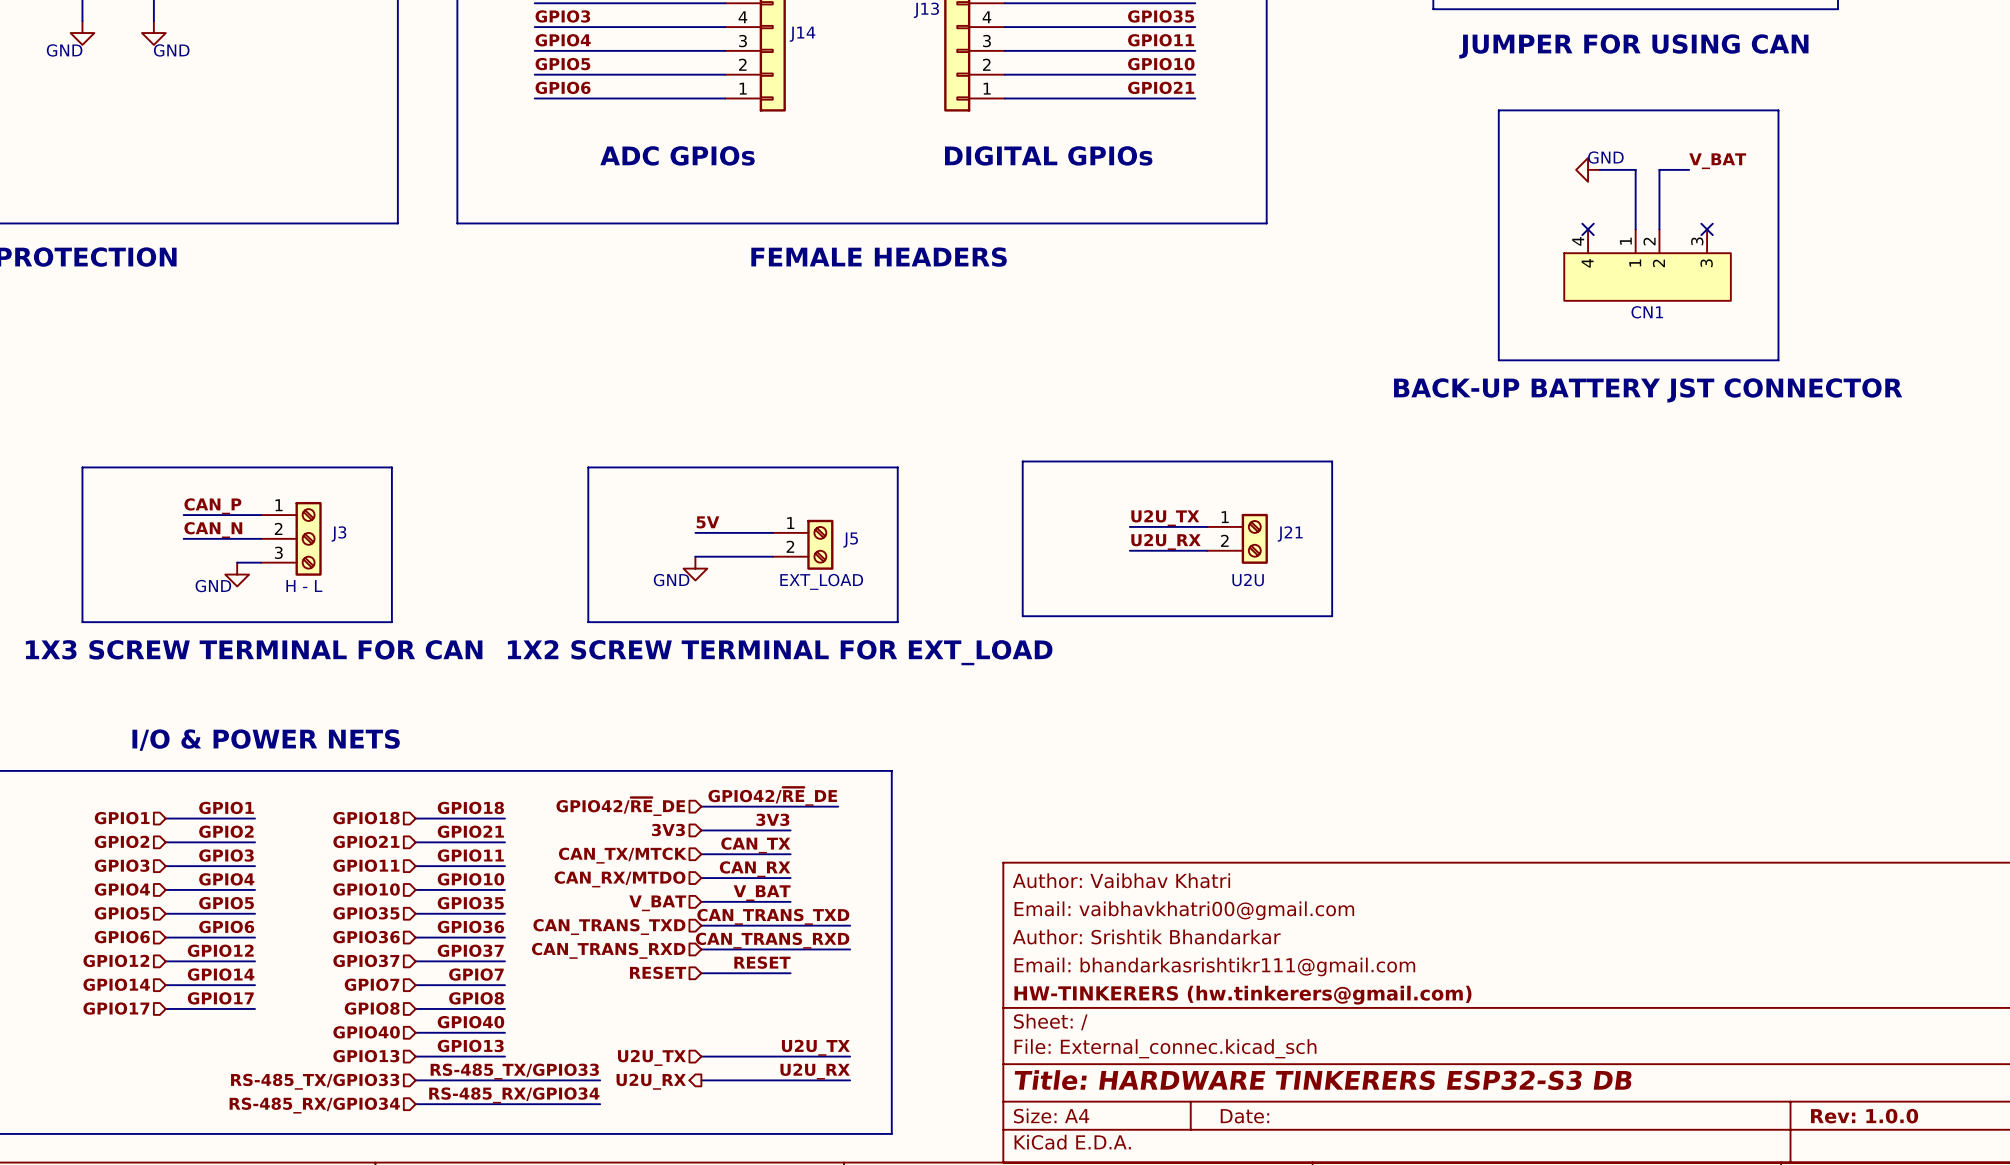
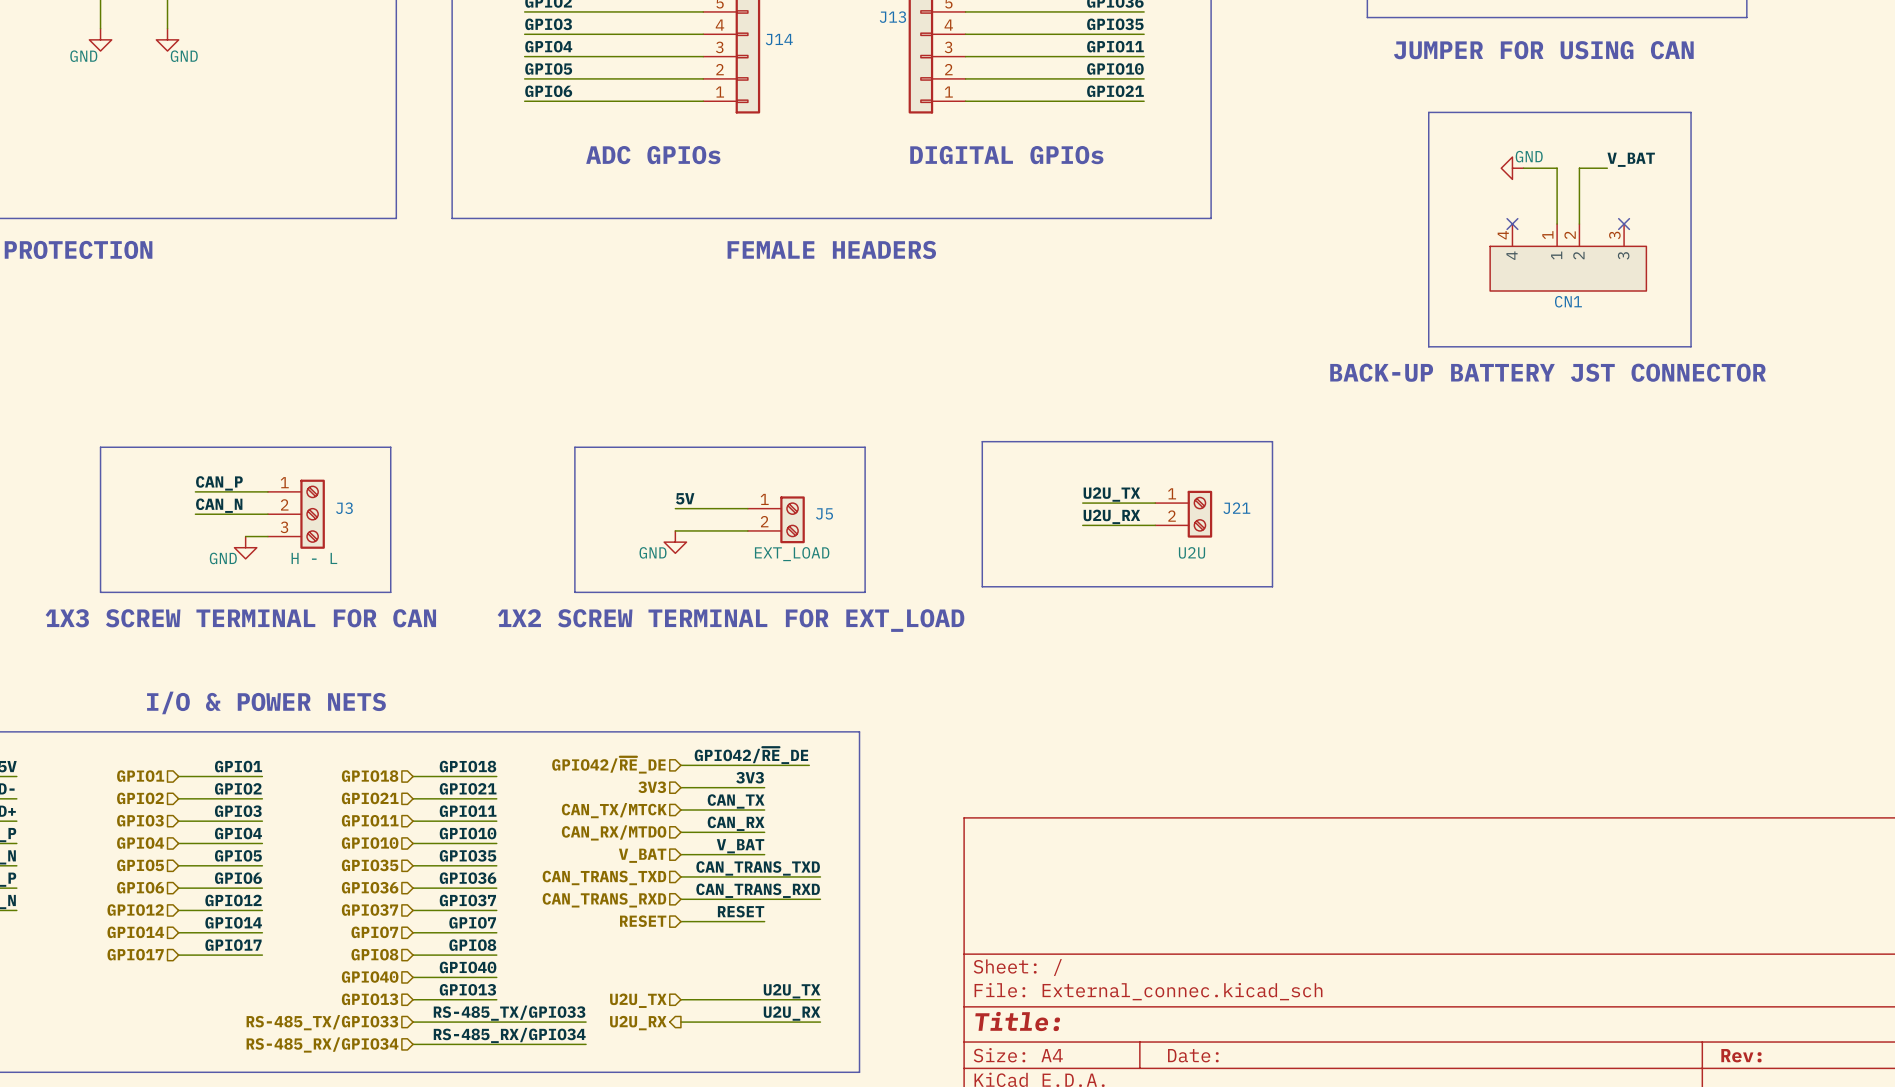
title block: Author: Vaibhav Khatri (1121, 880) -> none
title block: Email: vaibhavkhatri00@gmail.com (1184, 910) -> none
title block: Author: Srishtik Bhandarkar (1146, 936) -> none
title block: Email: bhandarkasrishtikr111@gmail.com (1214, 966) -> none
title block: HW-TINKERERS (hw.tinkerers@gmail.com) (1242, 995) -> none
title block: Title: HARDWARE TINKERERS ESP32-S3 DB (1323, 1080) -> Title: (1017, 1021)
title block: Rev: 1.0.0 (1864, 1116) -> Rev: (1741, 1055)

